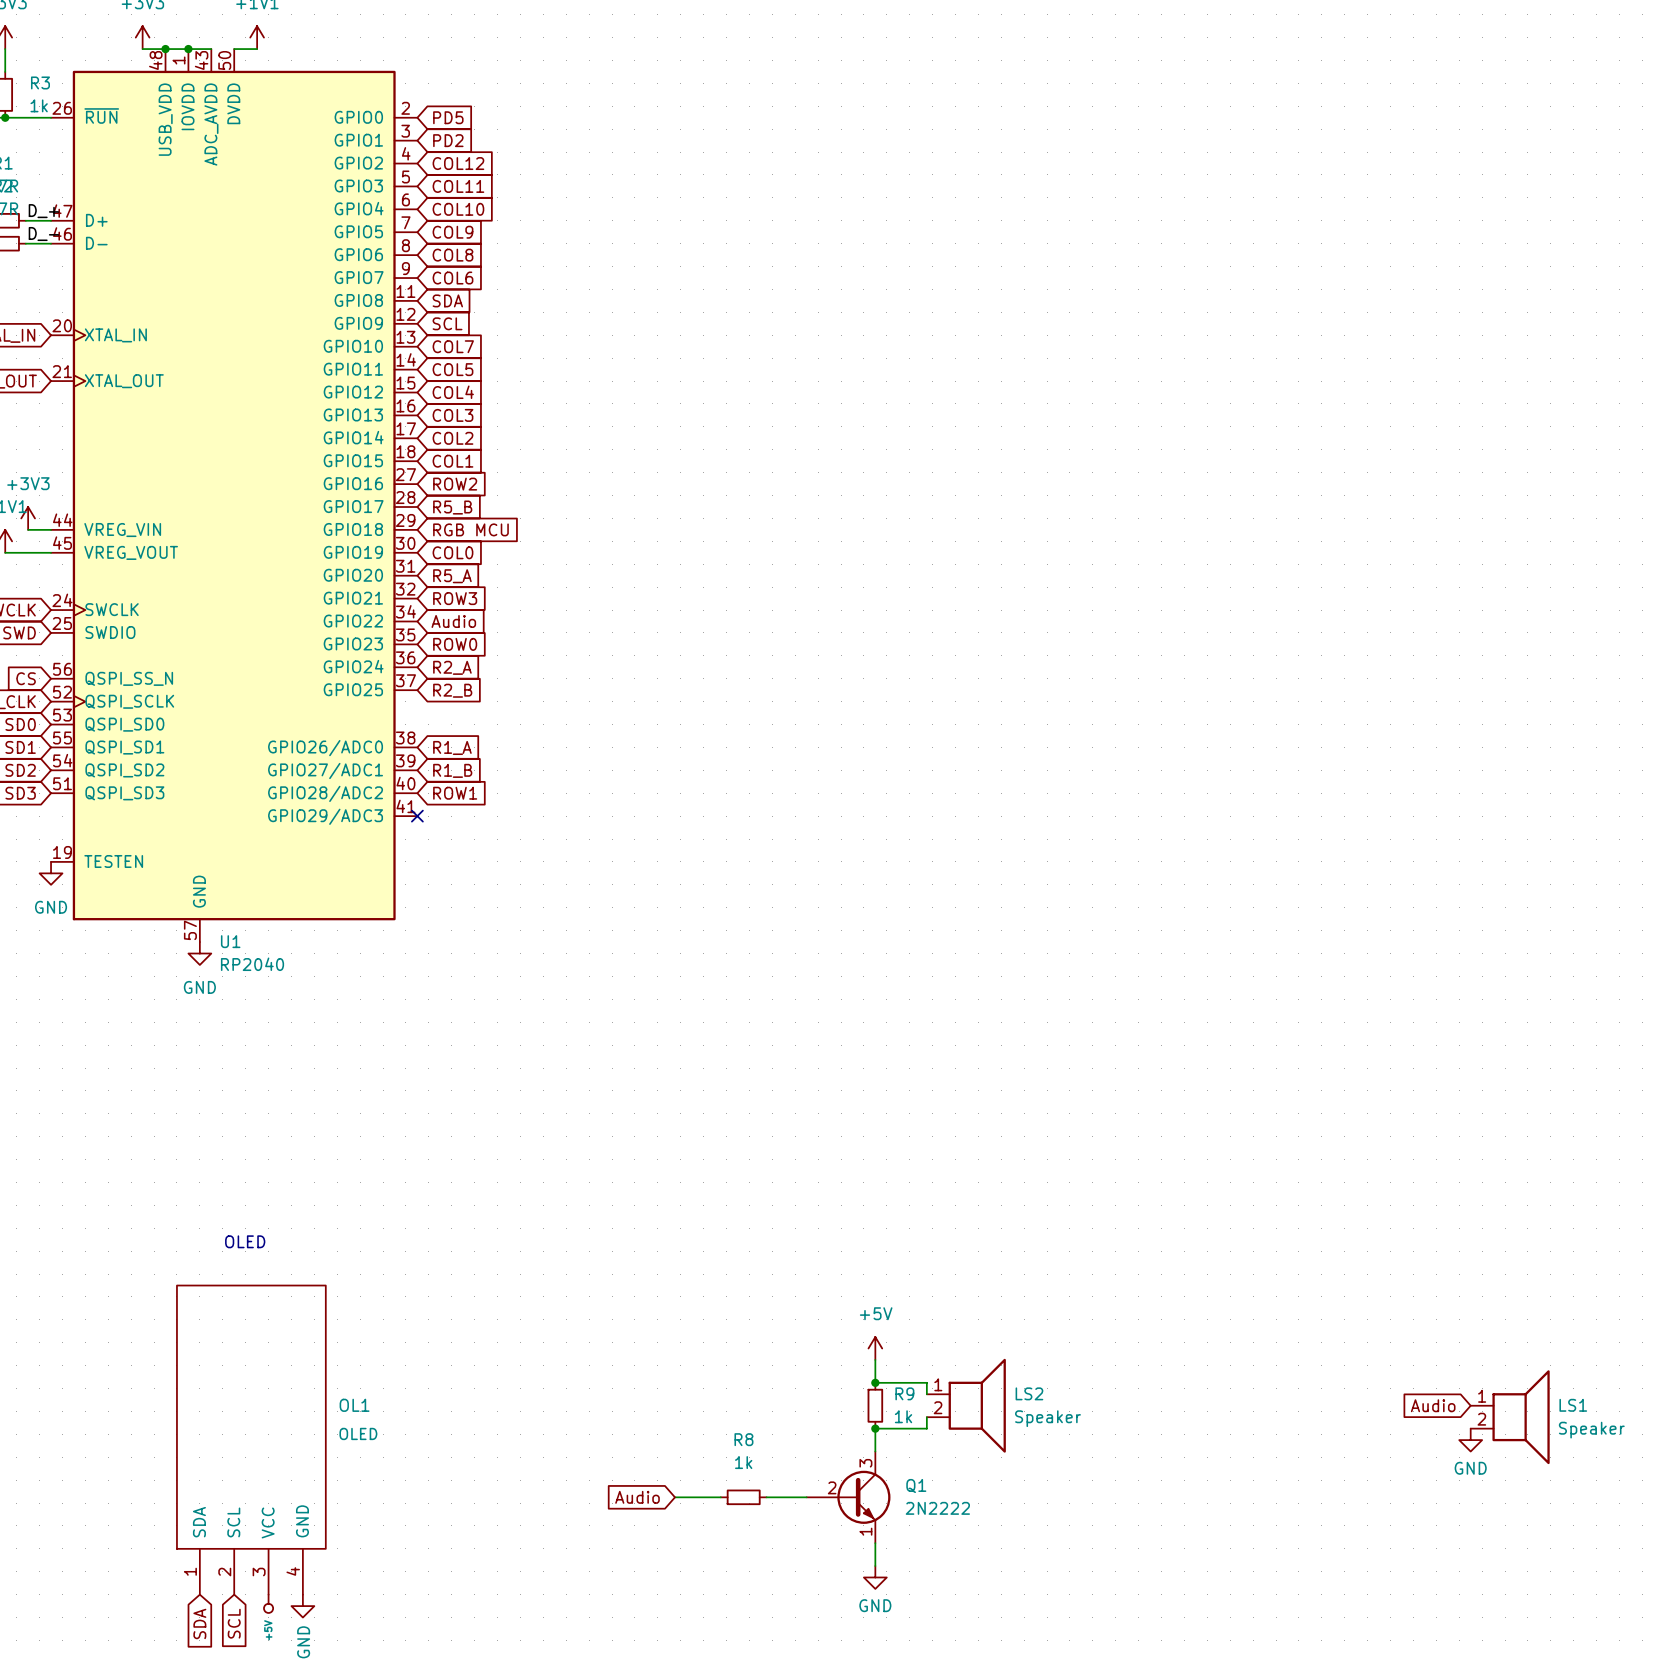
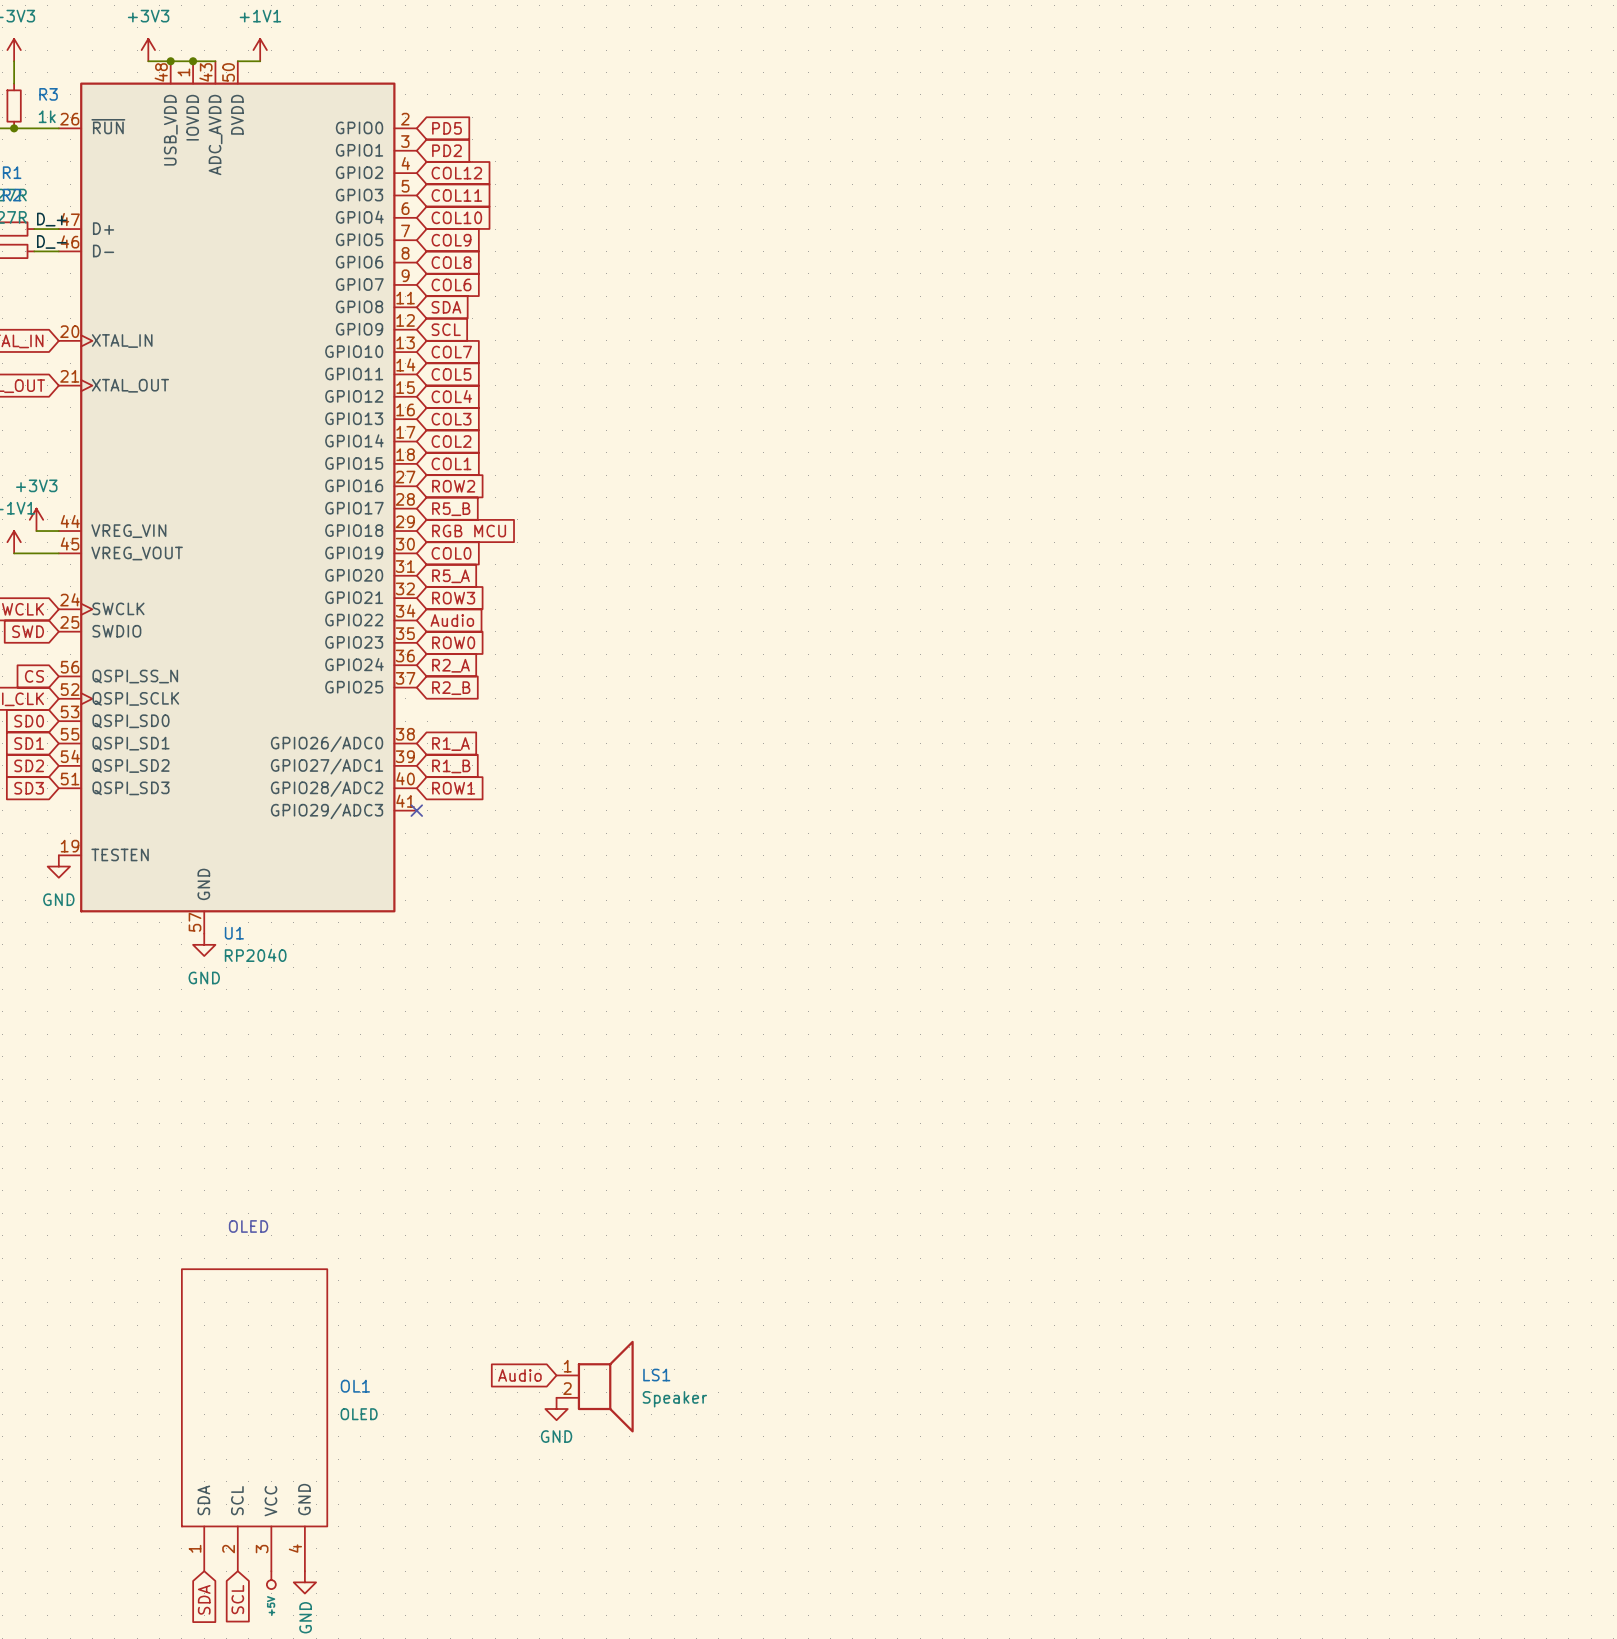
power symbol: +5V (875, 1348) -> none
wire: (875, 1359) (875, 1382) (926, 1382) (926, 1394) -> none
junction: (875, 1382) -> none
R9: 1k (875, 1405) -> none
LS2: Speaker (966, 1405) -> none
global label: Audio (1433, 1405) -> none
wire: (926, 1417) (926, 1428) (875, 1428) (875, 1451) -> none
LS1 position: (1510, 1417) -> (595, 1386)
power symbol: none -> GND (556, 1409)
junction: (875, 1428) -> none
power symbol: GND (1470, 1440) -> none
global label position: Audio (637, 1497) -> Audio (519, 1375)
wire: (674, 1497) (720, 1497) -> none
R8: 1k (743, 1497) -> none
wire: (766, 1497) (806, 1497) -> none
Q1: 2N2222 (848, 1497) -> none
wire: (875, 1543) (875, 1566) -> none
power symbol: GND (875, 1577) -> none

